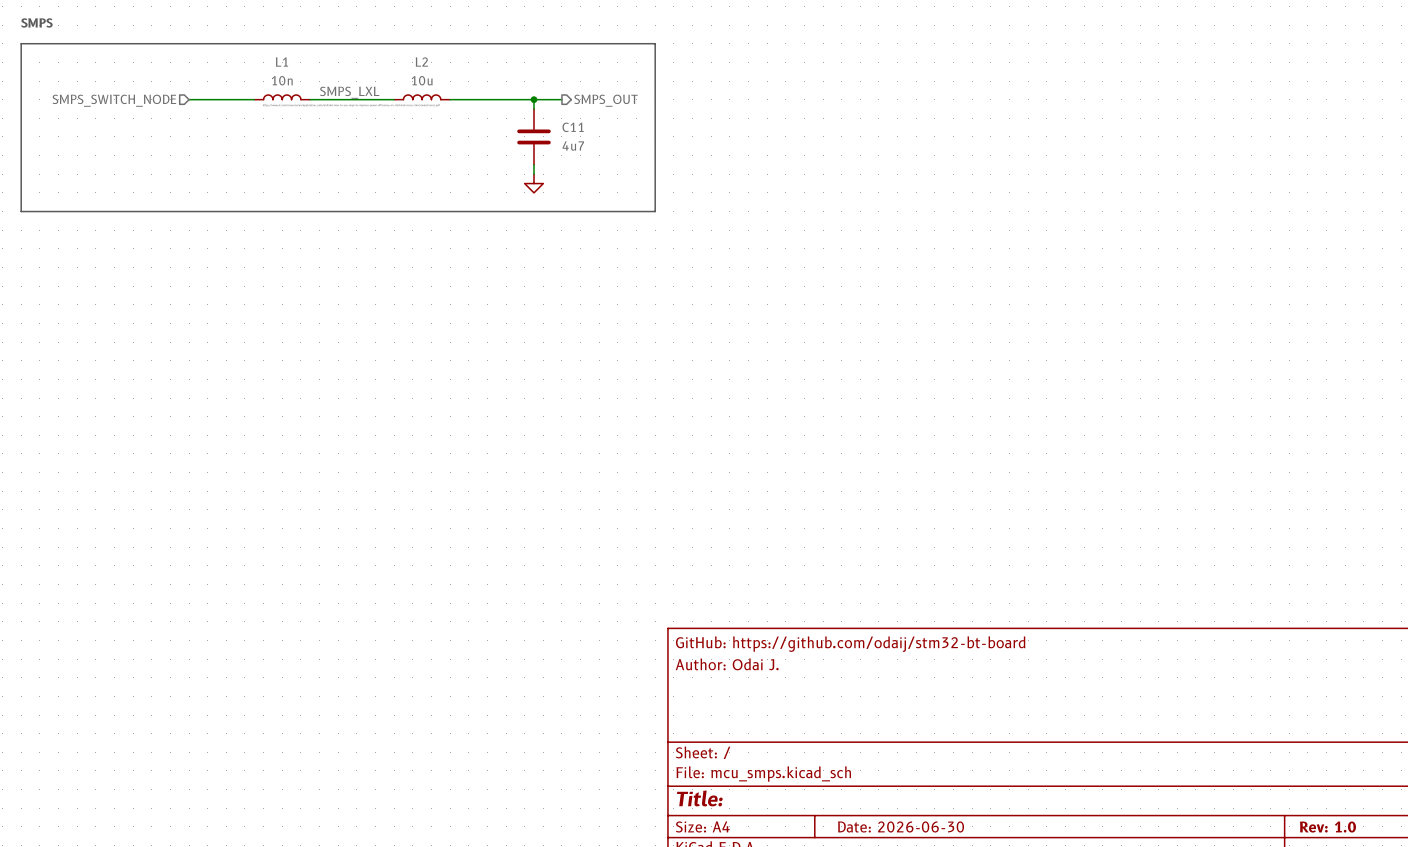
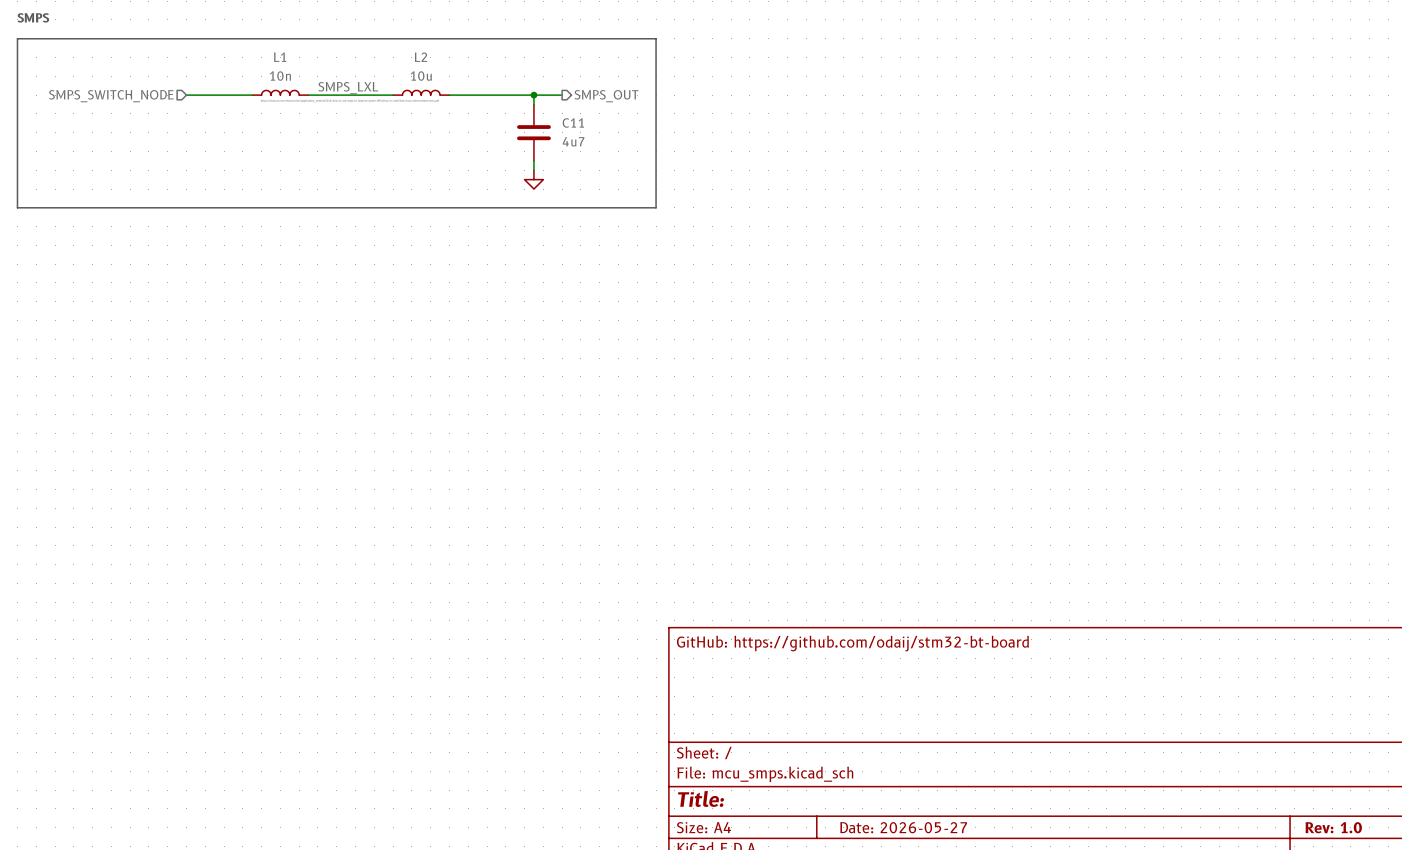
title block: Author: Odai J. (727, 664) -> none
title block: Date: 2026-06-30 (901, 826) -> Date: 2026-05-27 (903, 827)

